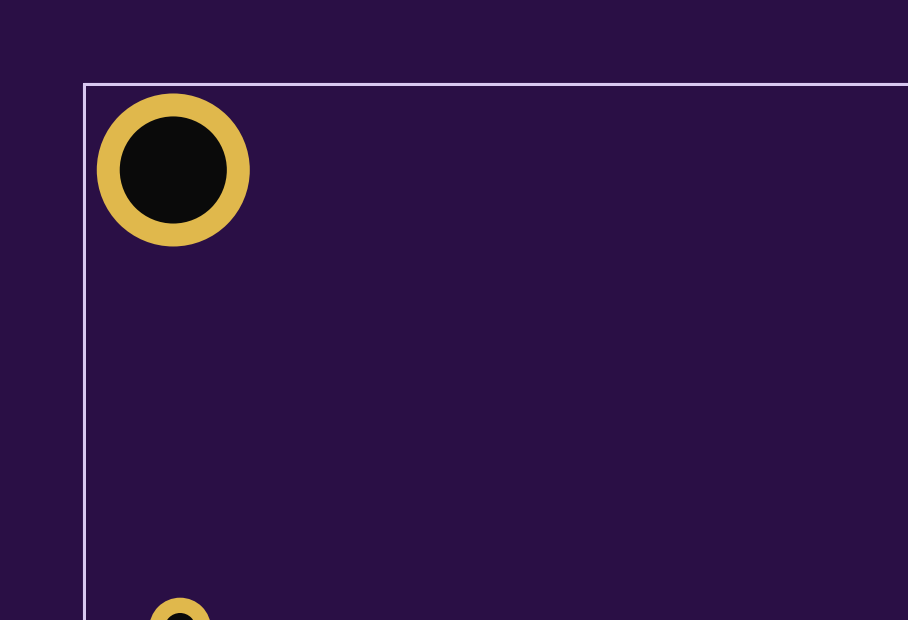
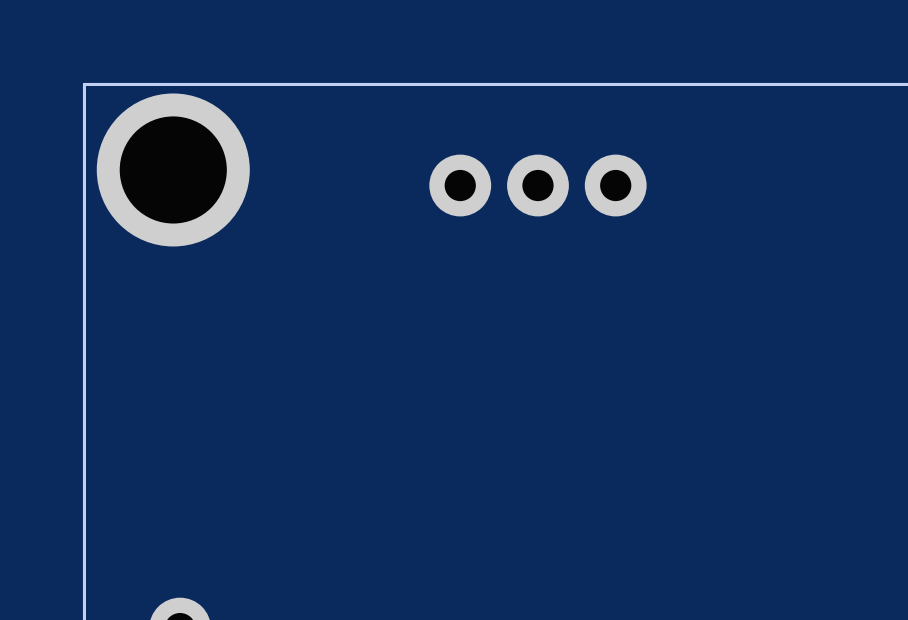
part: none -> (537, 185)

